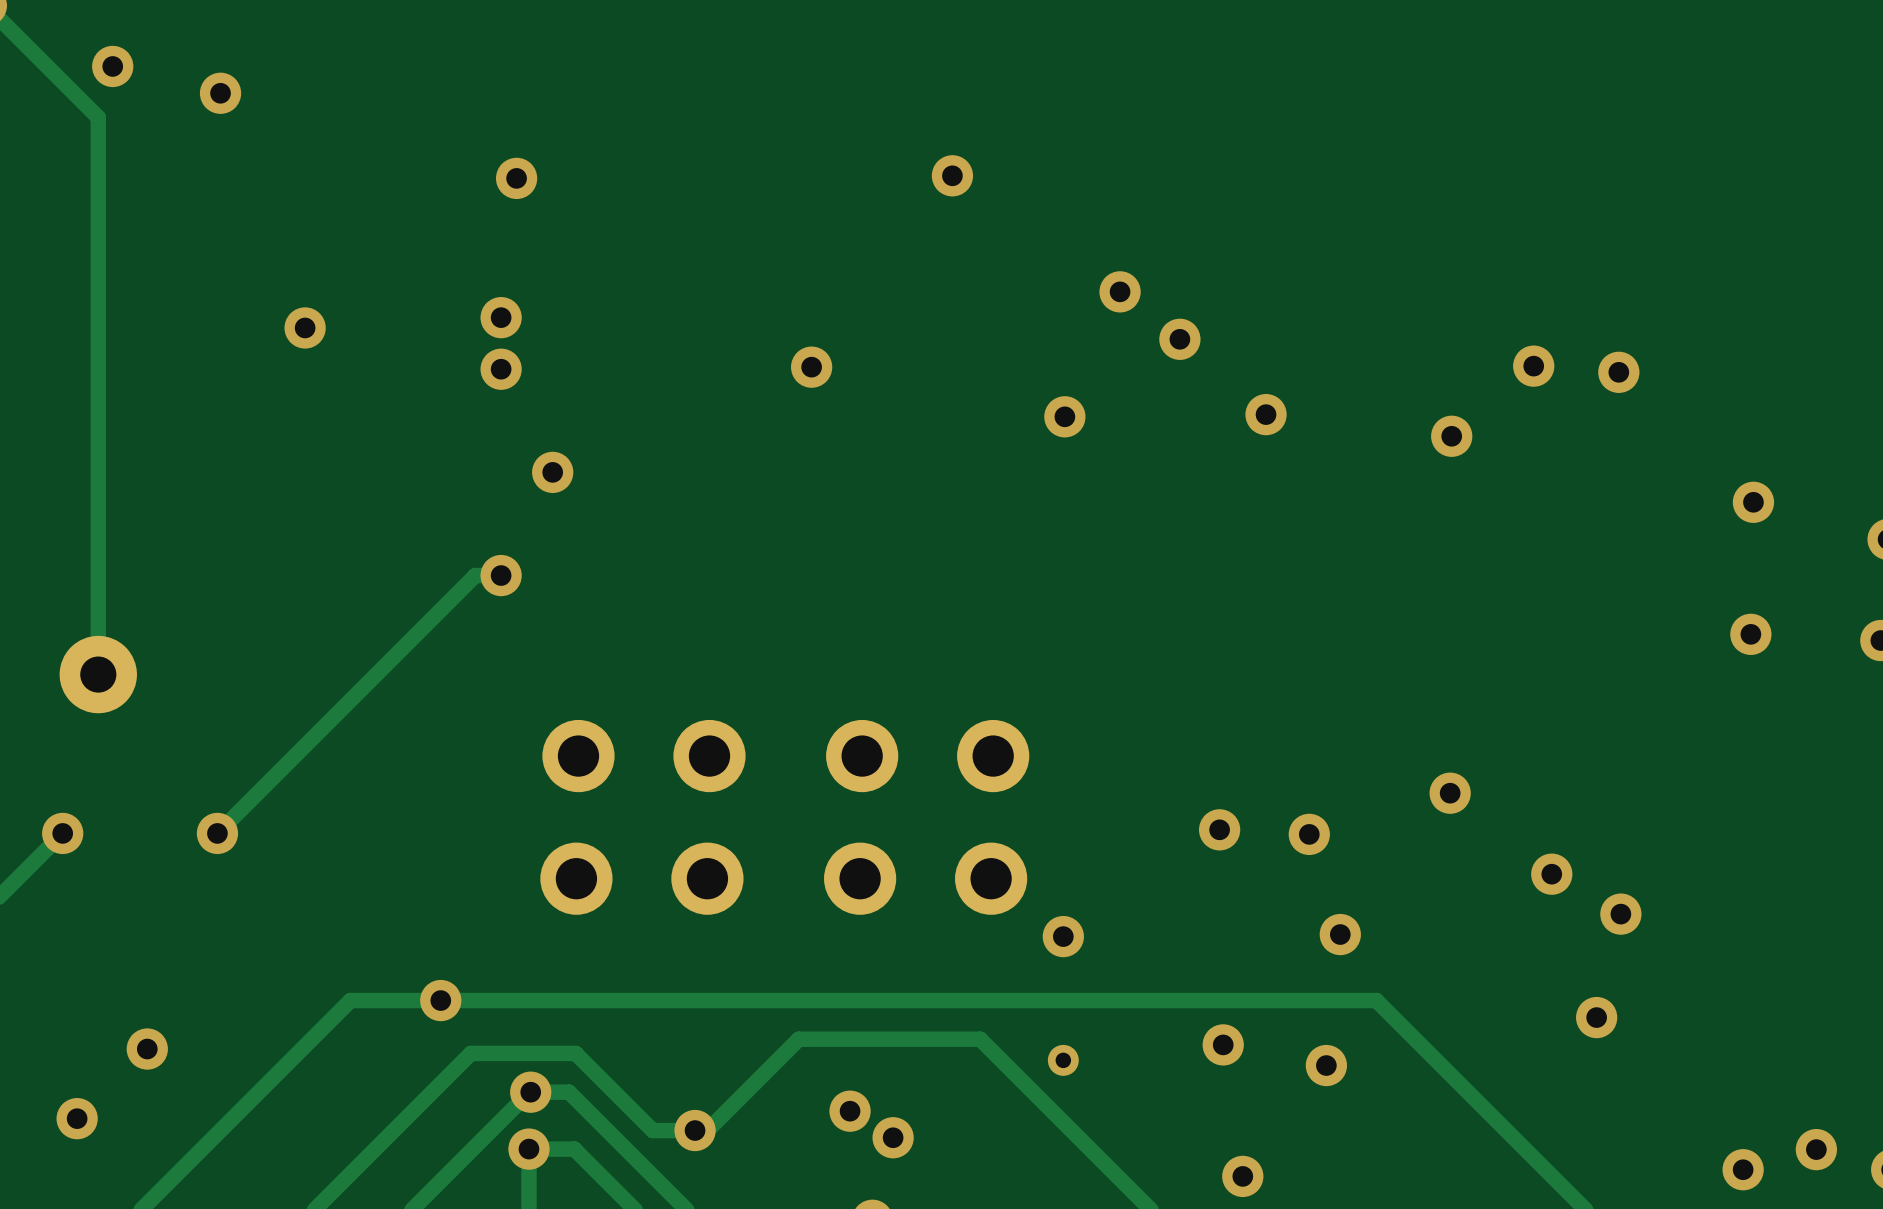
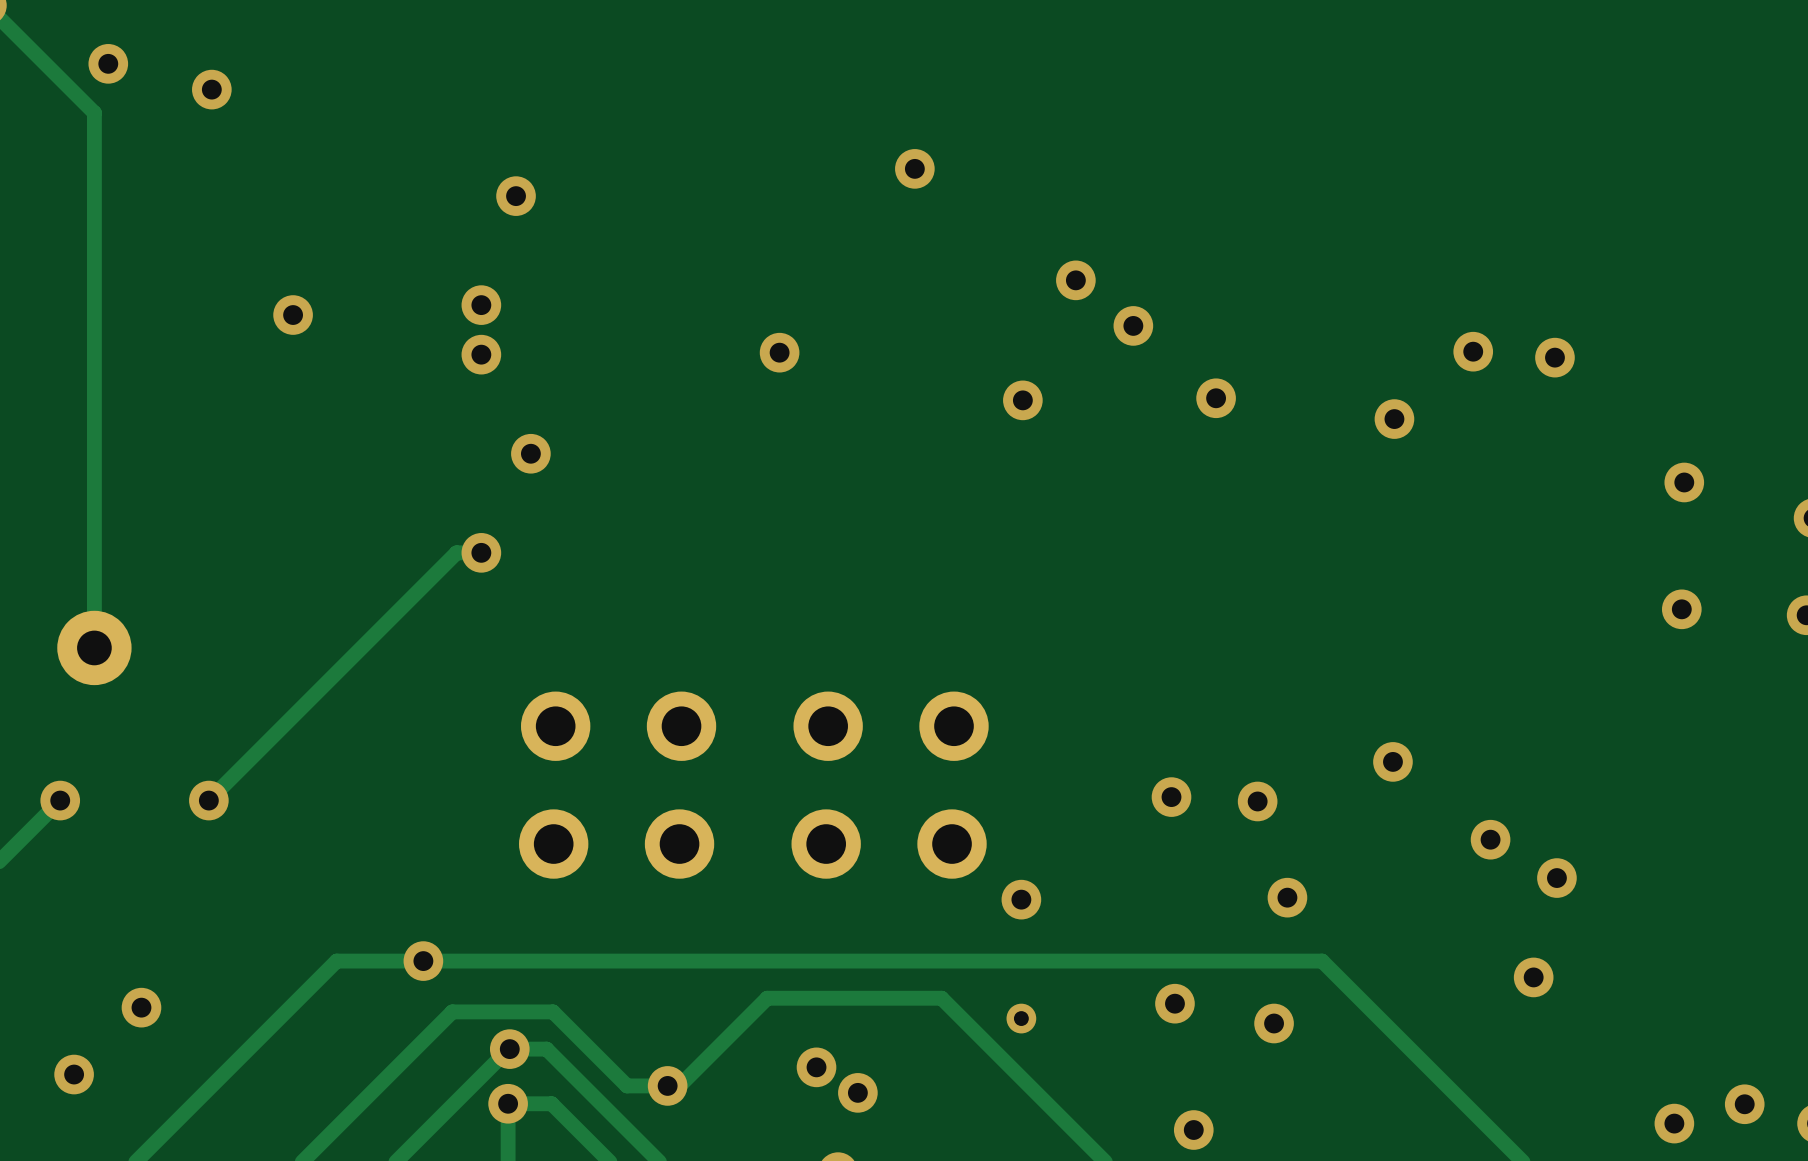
via position: (516, 178) -> (516, 196)

